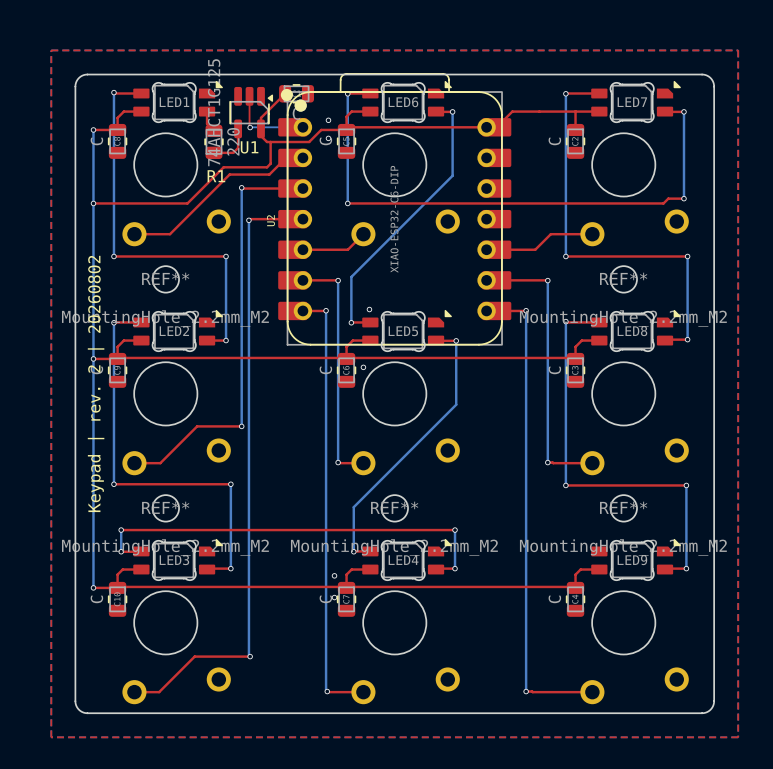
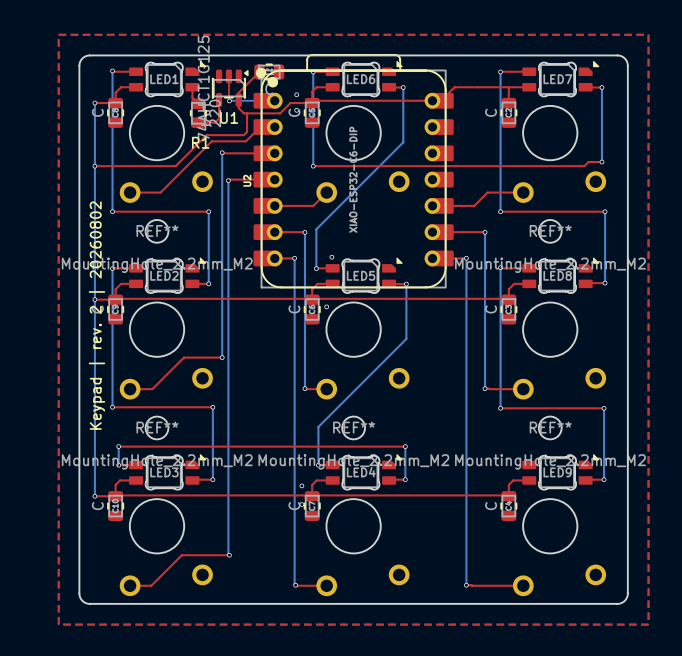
U1 footprint: [229, 86, 274, 139] -> [212, 69, 249, 107]

